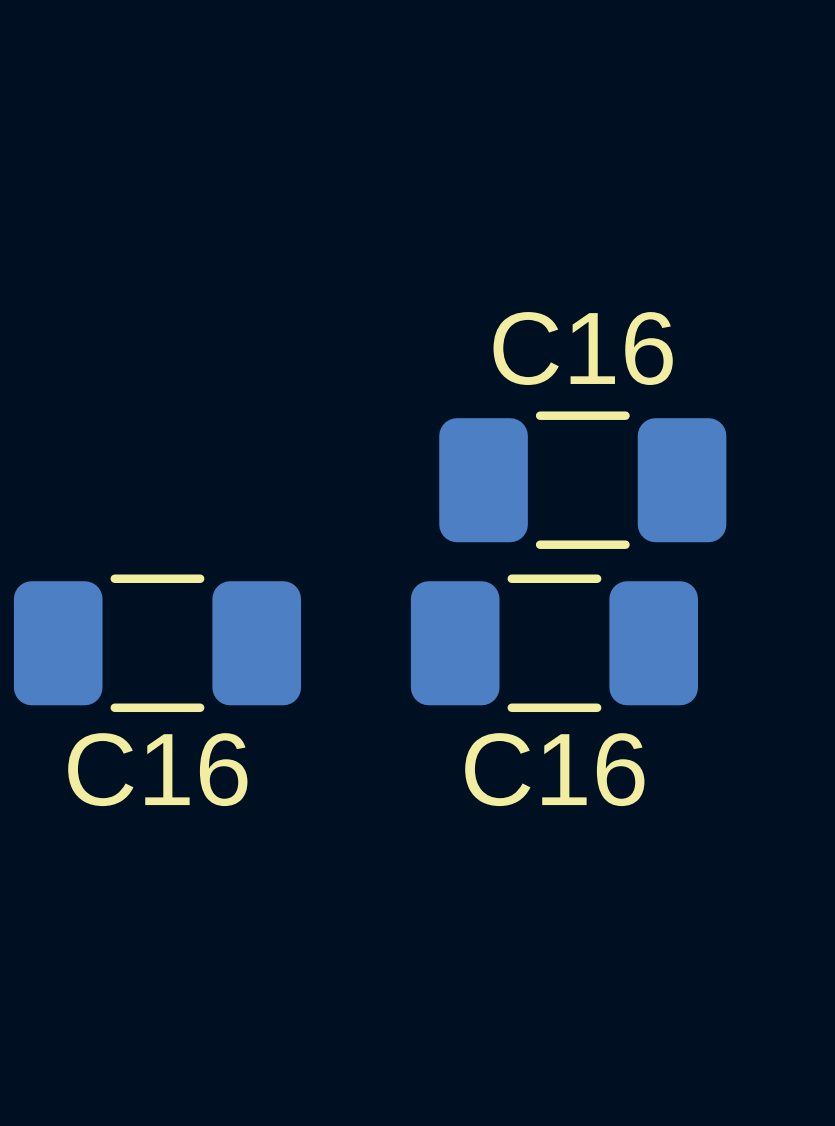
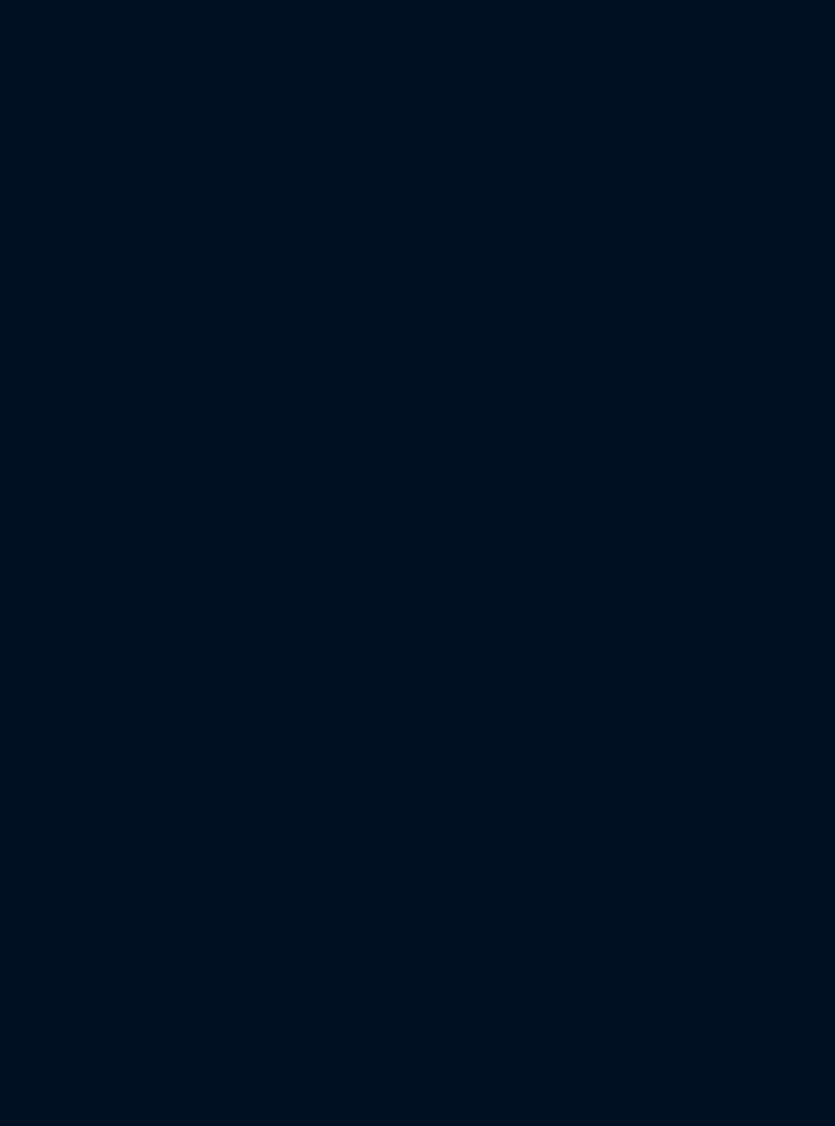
C16: (582, 480) -> none
C16: (157, 643) -> none
C16: (554, 643) -> none

